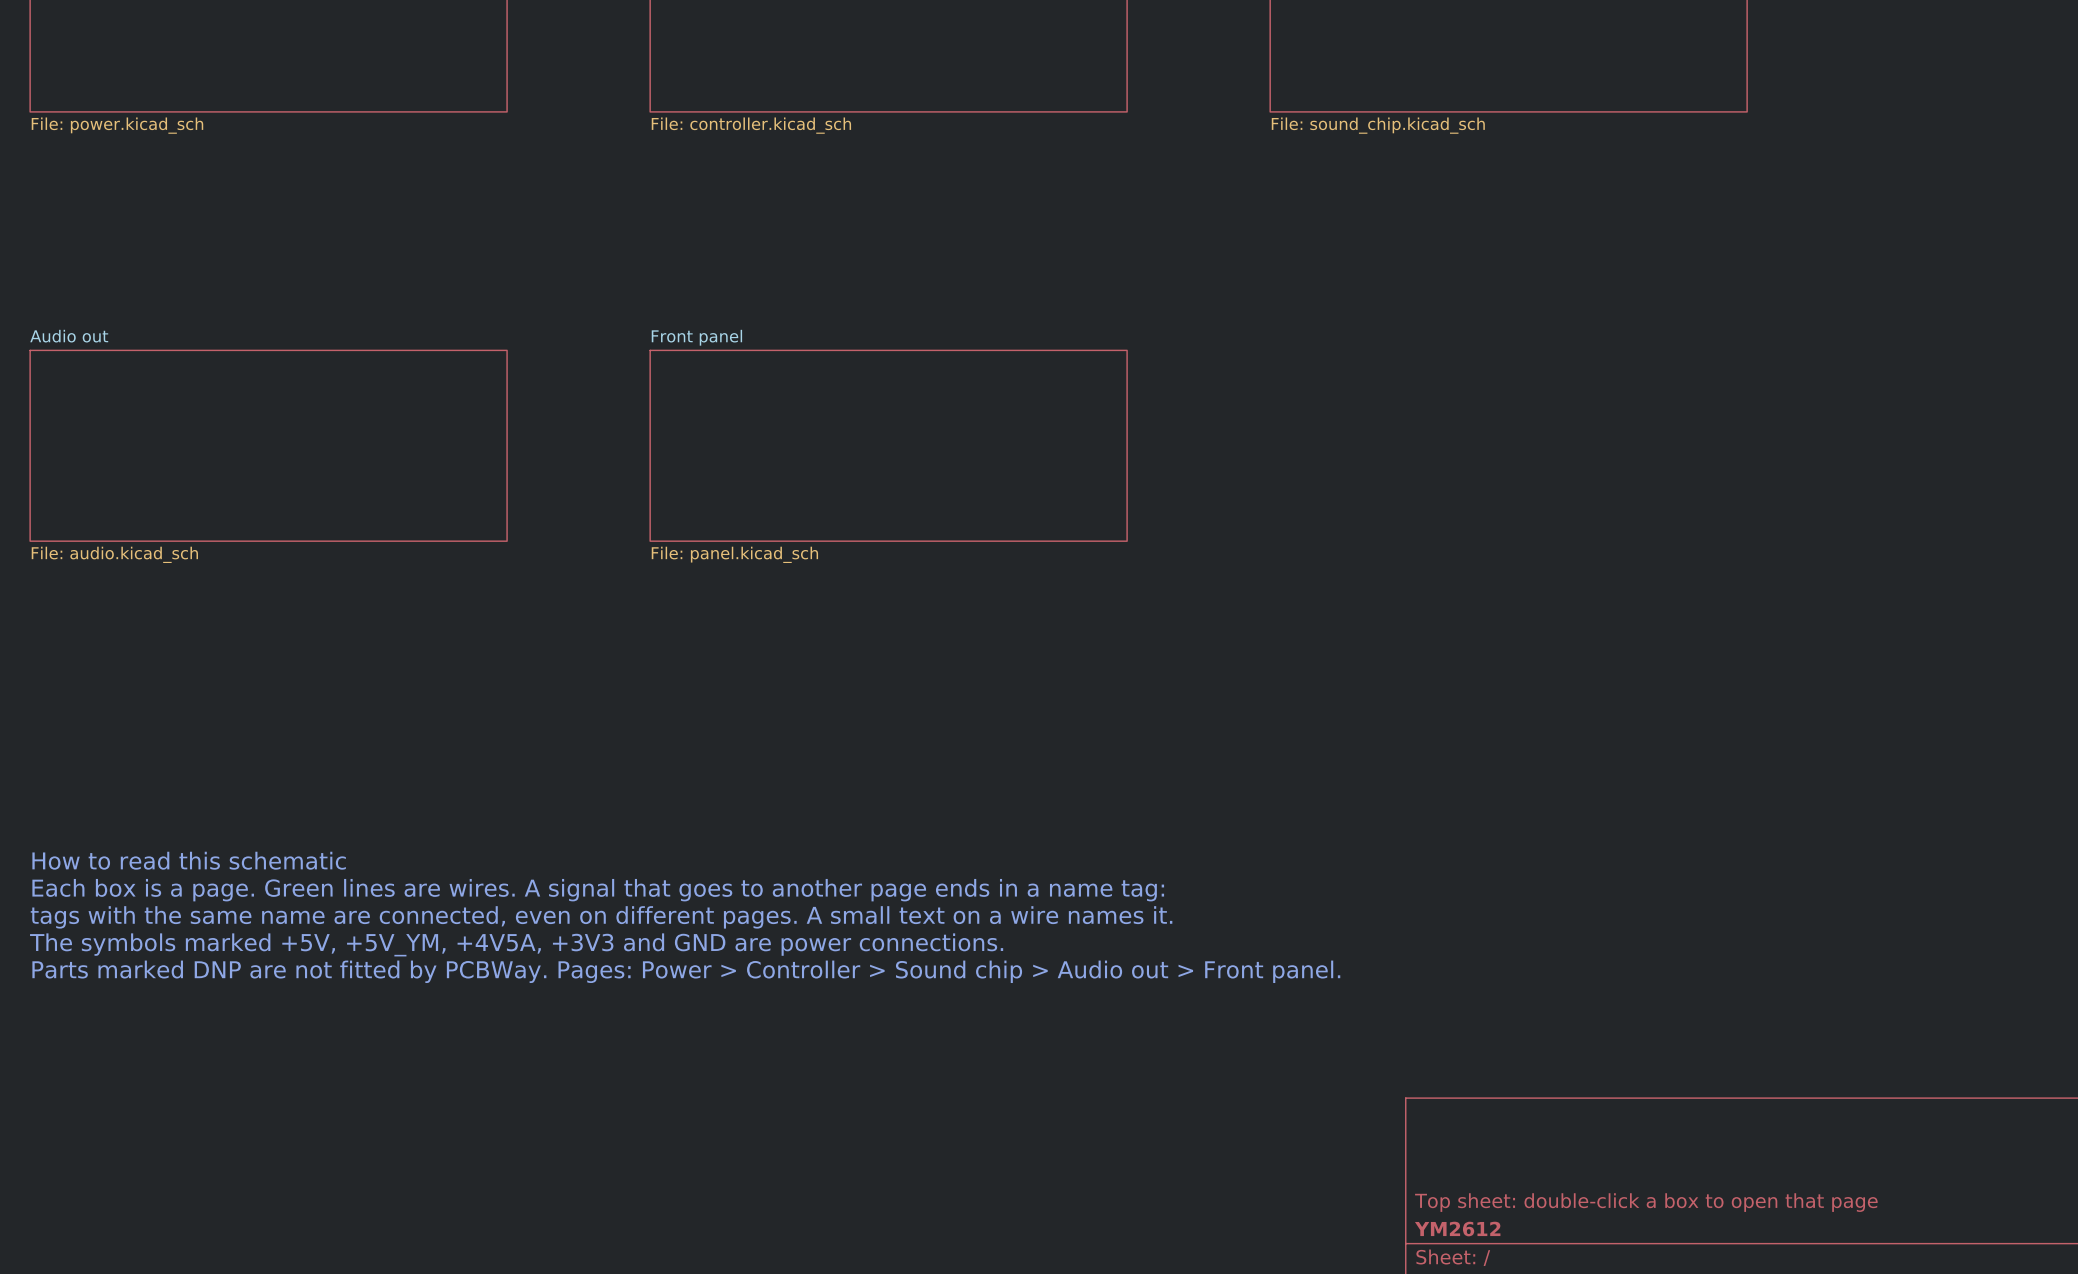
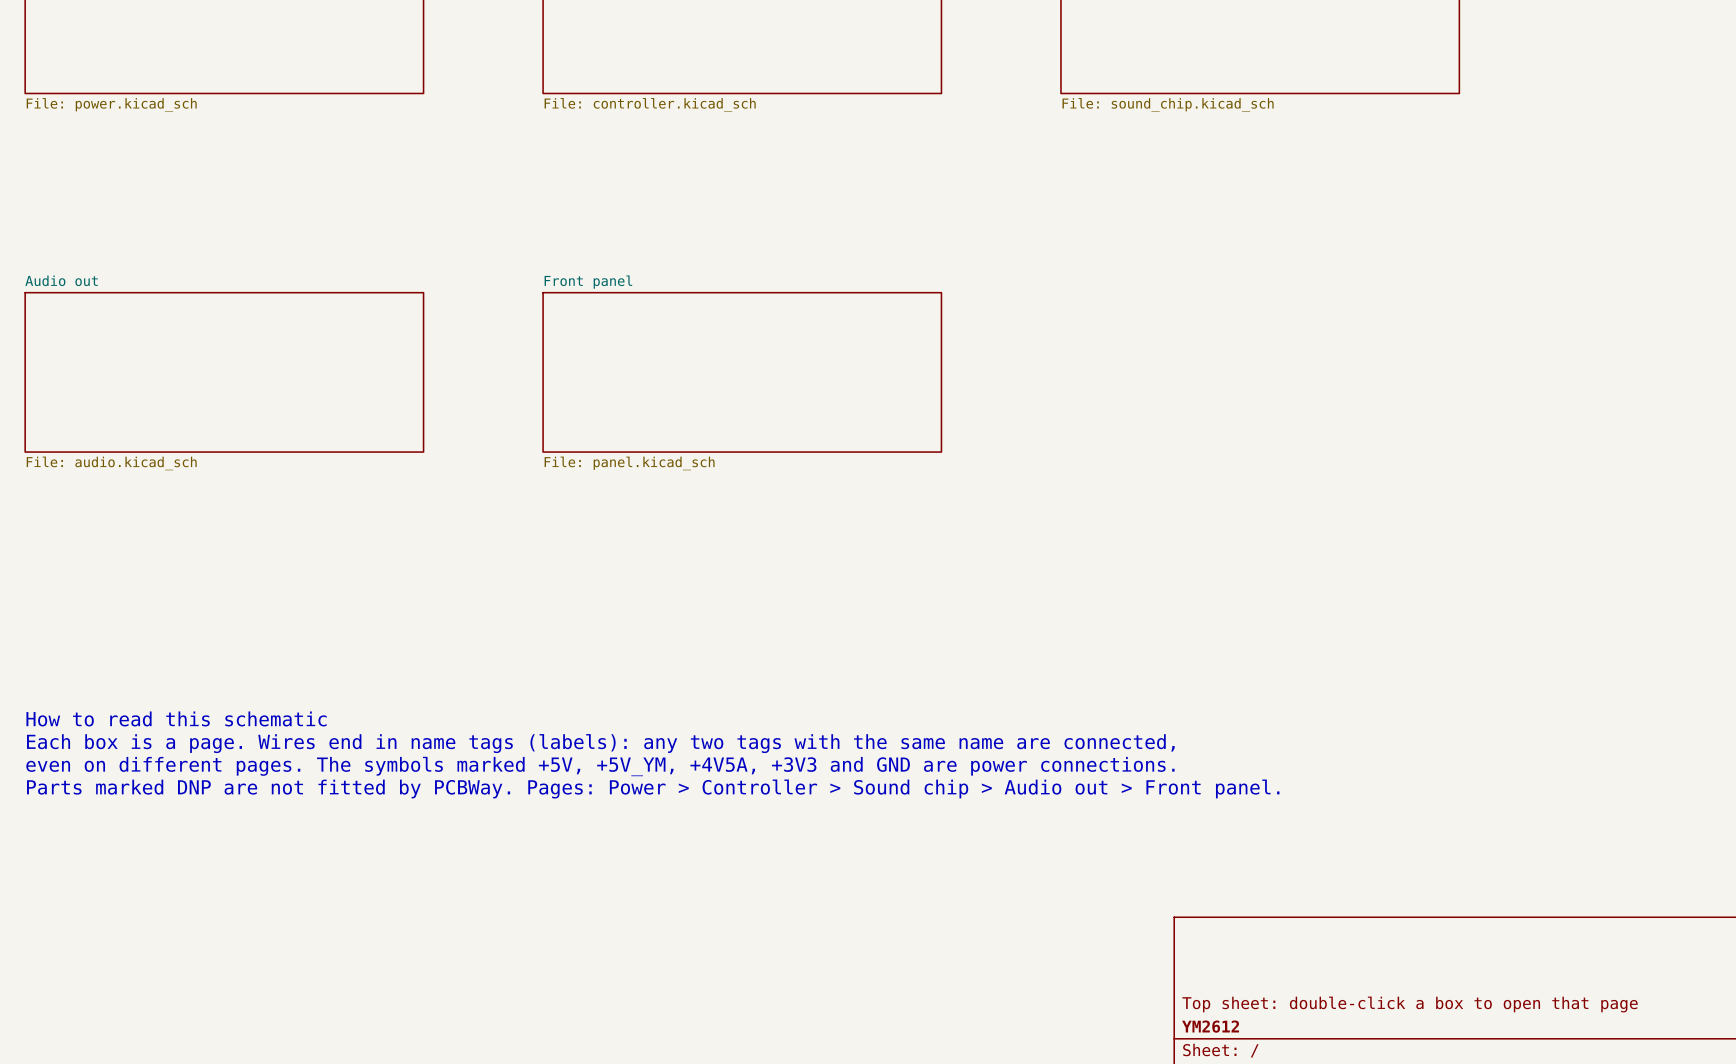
text: Each box is a page. Green lines are wires. A signal that goes to another page ends in a name tag: (598, 890) -> Each box is a page. Wires end in name tags (labels): any two tags with the same name are connected, (600, 743)
text: tags with the same name are connected, even on different pages. A small text on a wire names it. (601, 917) -> even on different pages. The symbols marked +5V, +5V_YM, +4V5A, +3V3 and GND are power connections. (600, 766)
text: The symbols marked +5V, +5V_YM, +4V5A, +3V3 and GND are power connections. (516, 944) -> Parts marked DNP are not fitted by PCBWay. Pages: Power > Controller > Sound chip > Audio out > Front panel. (653, 789)
text: Parts marked DNP are not fitted by PCBWay. Pages: Power > Controller > Sound chip > Audio out > Front panel. (686, 971) -> none

